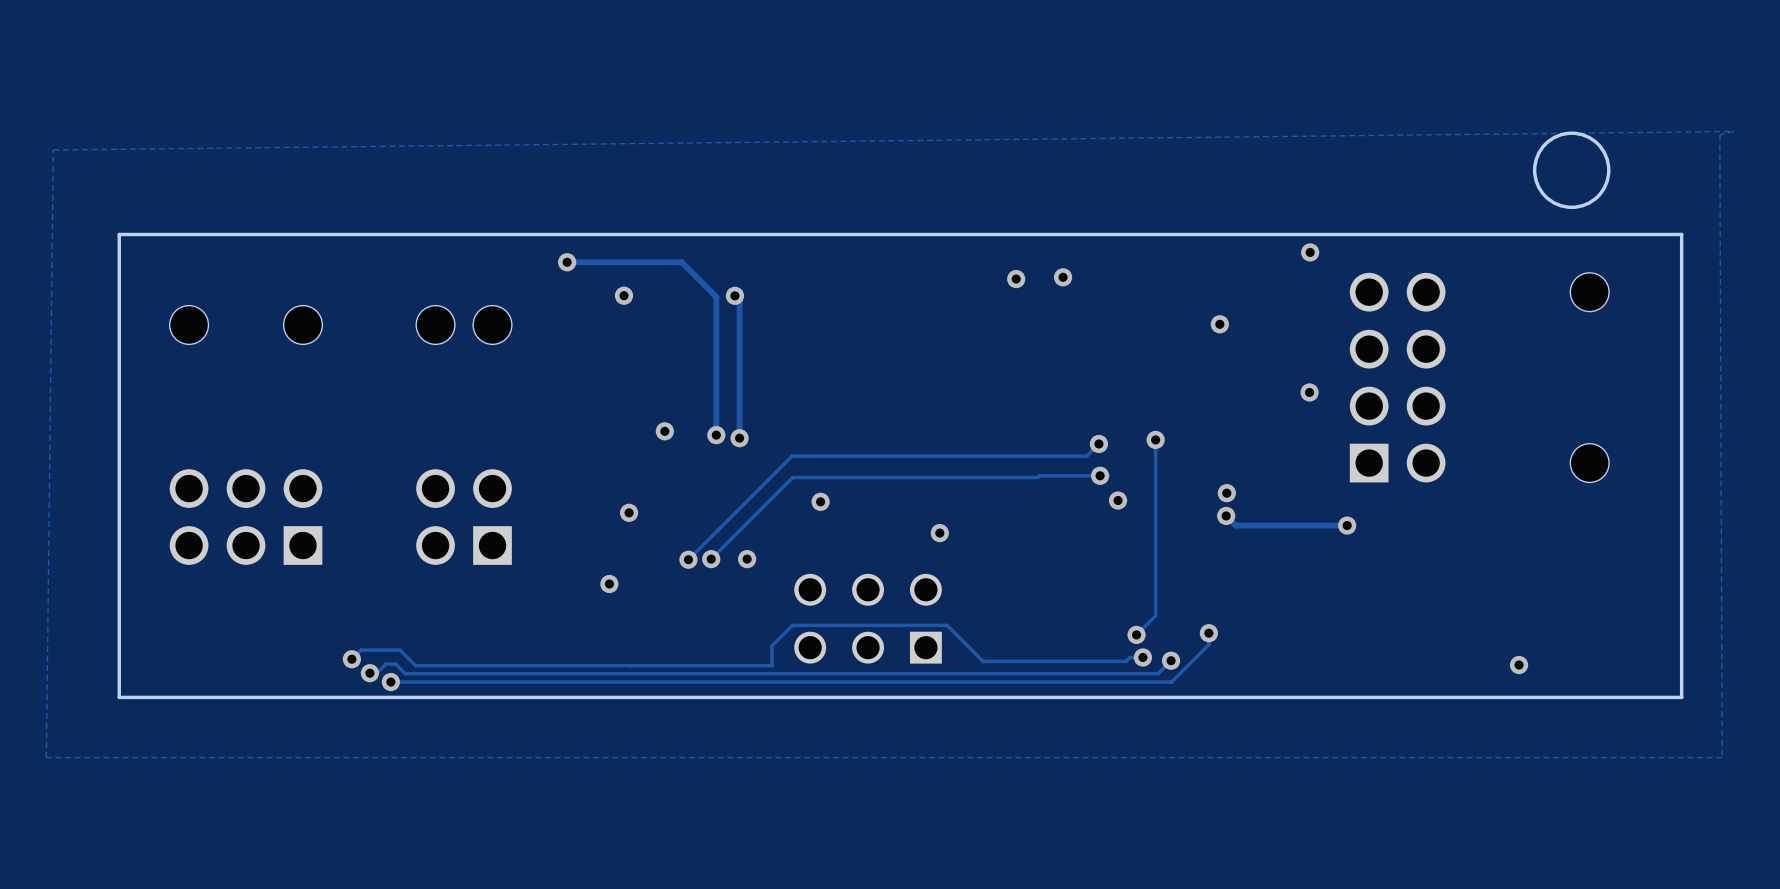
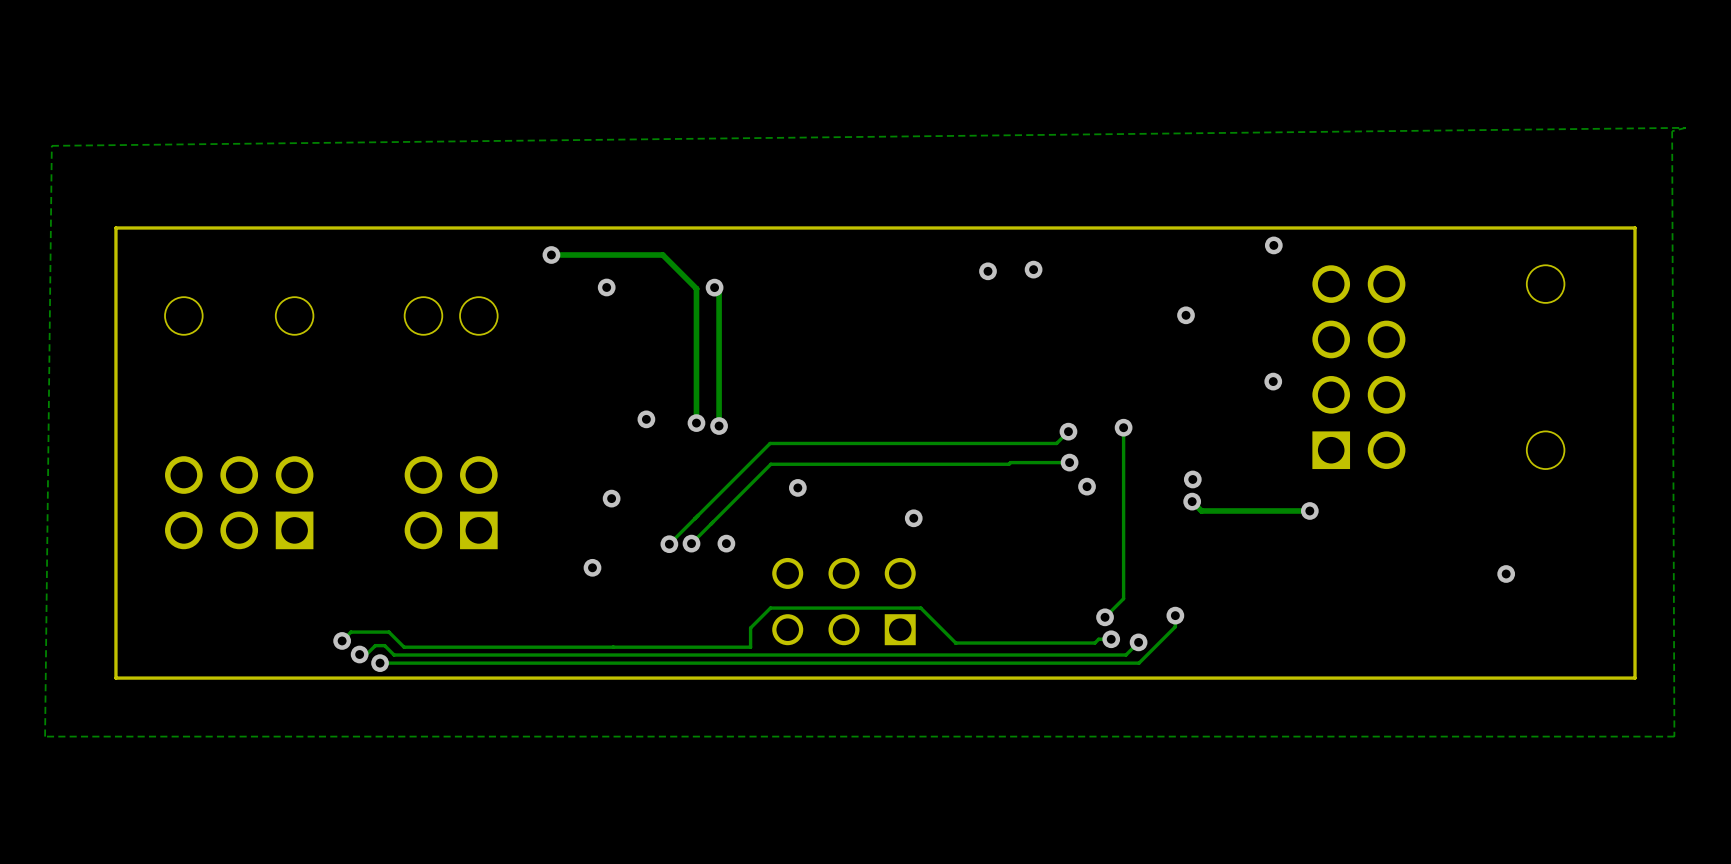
round board edge: [1532, 131, 1611, 210] -> none
via position: (1519, 665) -> (1506, 573)

